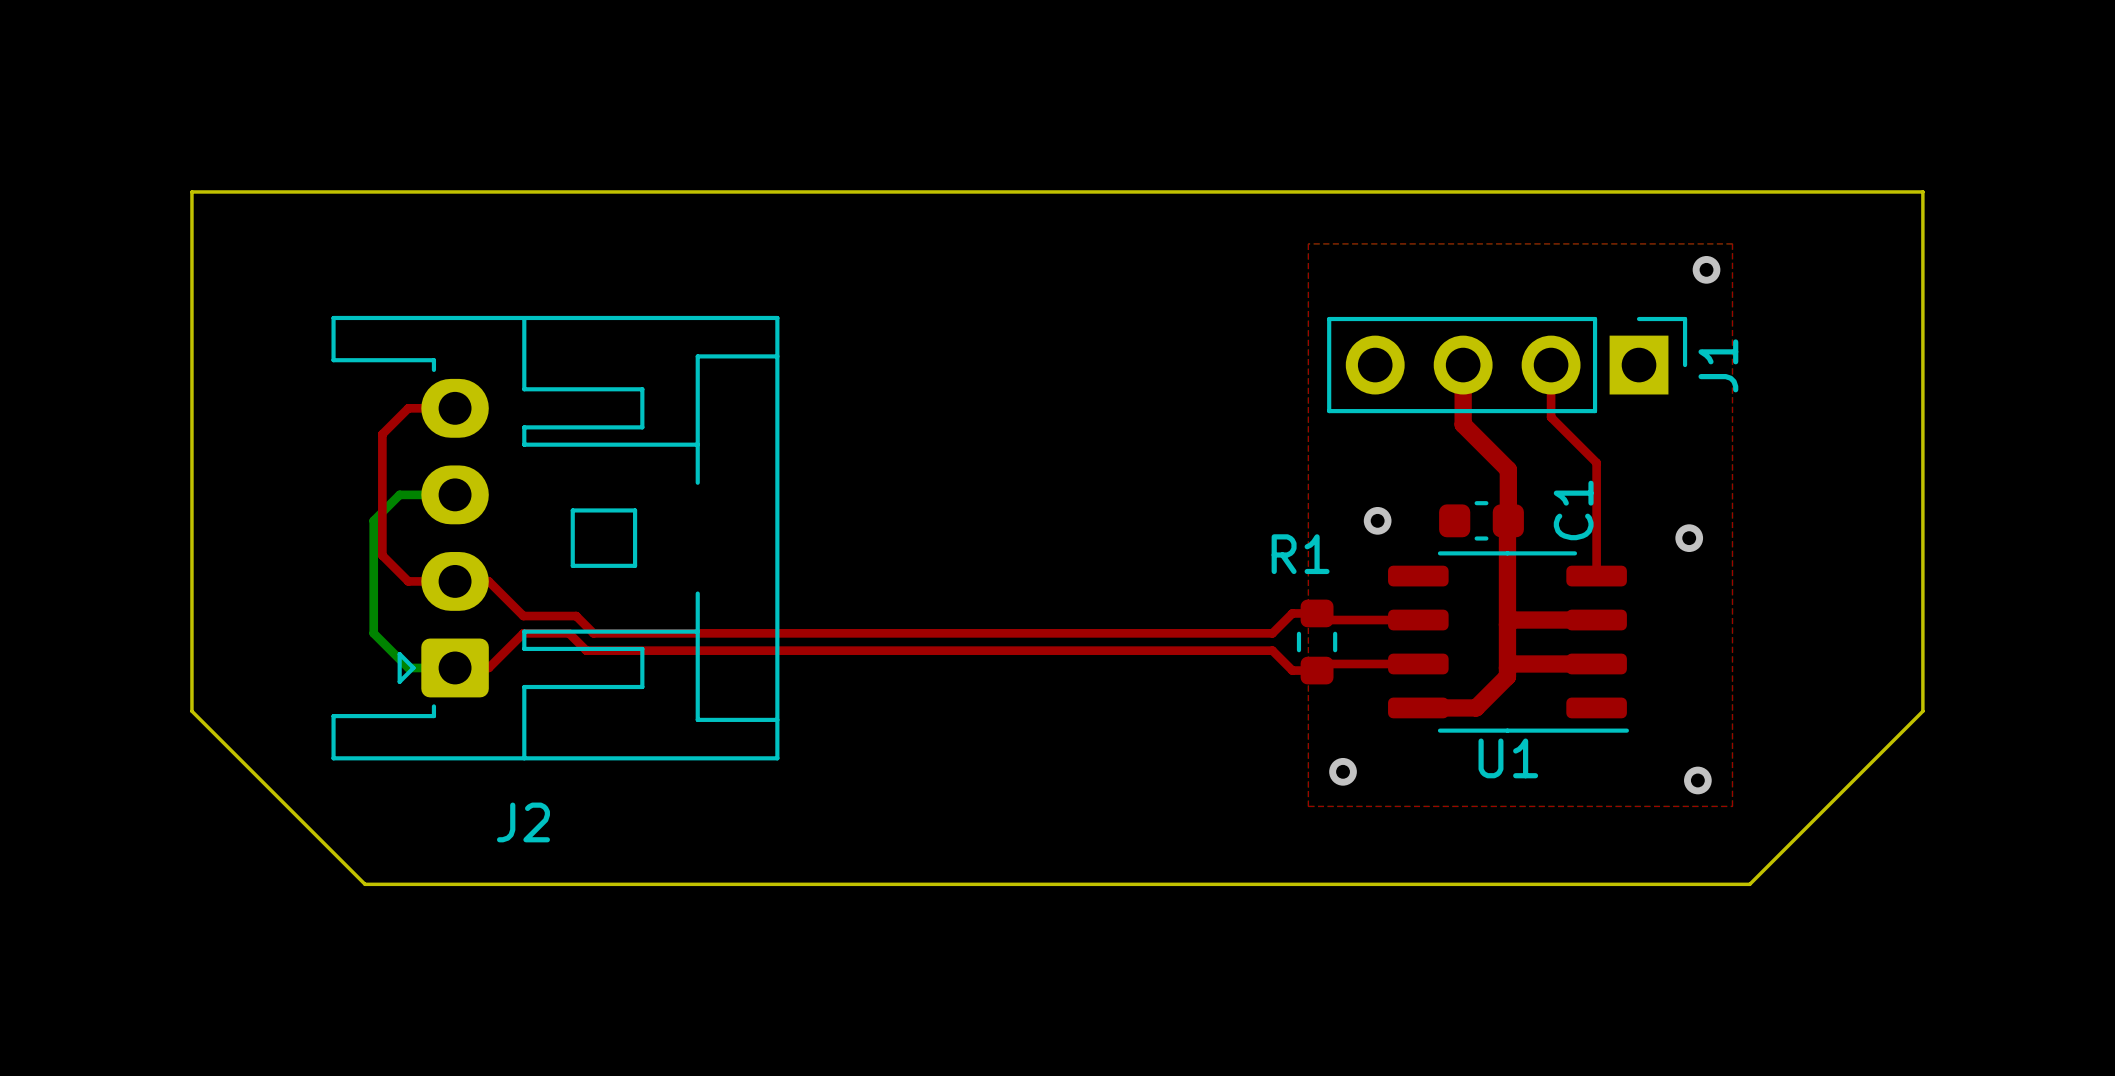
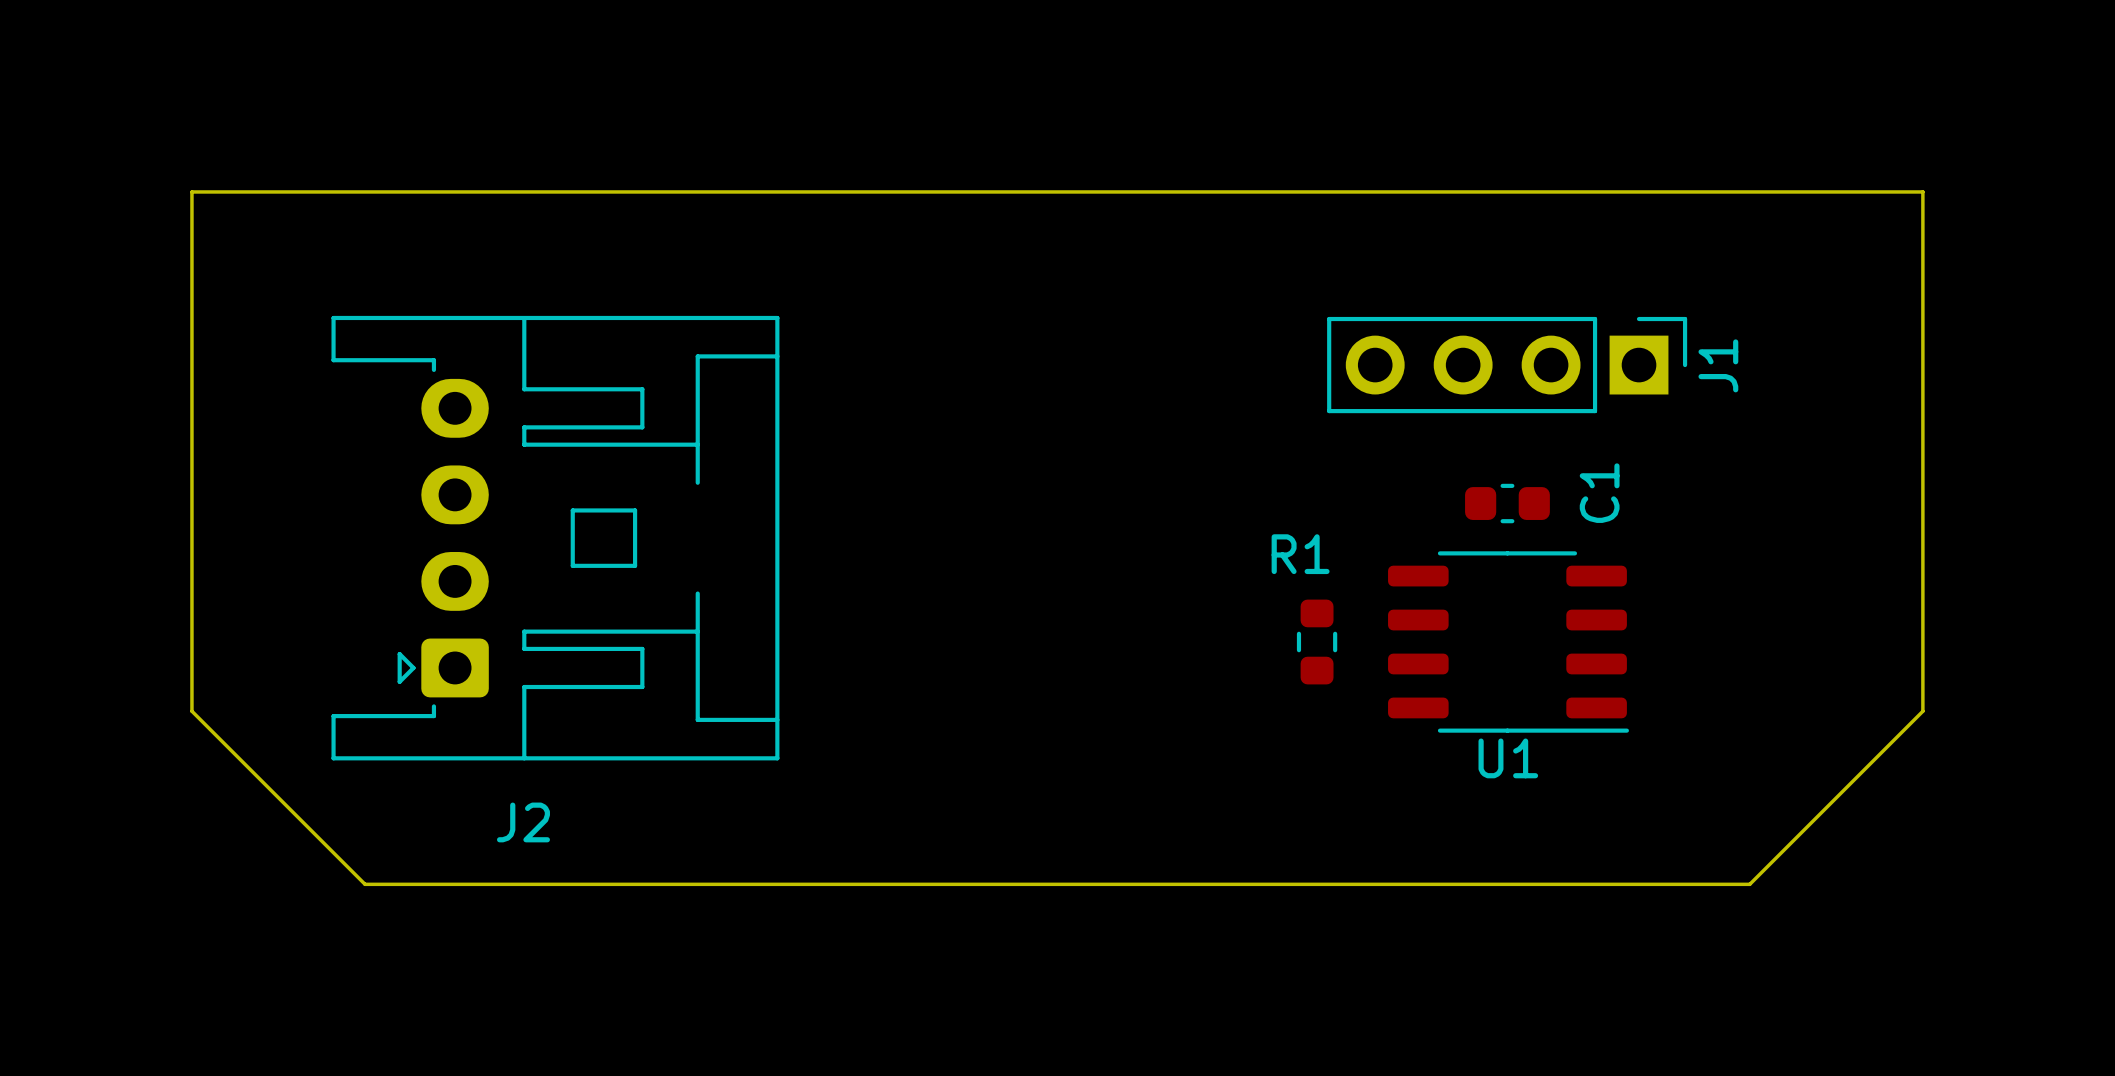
top zone outline: (1308, 243) (1732, 243) (1732, 806) (1308, 806) (1308, 243) -> none
via: (1706, 269) -> none
top track: (1463, 365) (1463, 424) (1508, 469) (1507, 676) (1476, 707) (1418, 707) -> none
top track: (1551, 365) (1551, 417) (1596, 462) (1596, 576) -> none
top track: (455, 408) (408, 408) (382, 434) (382, 555) (408, 581) (488, 581) (523, 616) (576, 616) (593, 633) (1272, 633) (1292, 613) (1317, 613) (1323, 620) (1418, 620) -> none
bottom track: (455, 494) (399, 494) (373, 520) (373, 633) (408, 667) (455, 667) -> none
via: (1377, 520) -> none
C1 position: (1481, 520) -> (1507, 503)
via: (1689, 538) -> none
top track: (1596, 620) (1512, 620) (1507, 624) -> none
top track: (1418, 663) (1323, 663) (1317, 670) (1292, 670) (1272, 650) (586, 650) (569, 633) (523, 633) (488, 667) (455, 667) -> none
top track: (1596, 663) (1511, 663) (1507, 667) -> none
via: (1343, 771) -> none
via: (1697, 780) -> none

